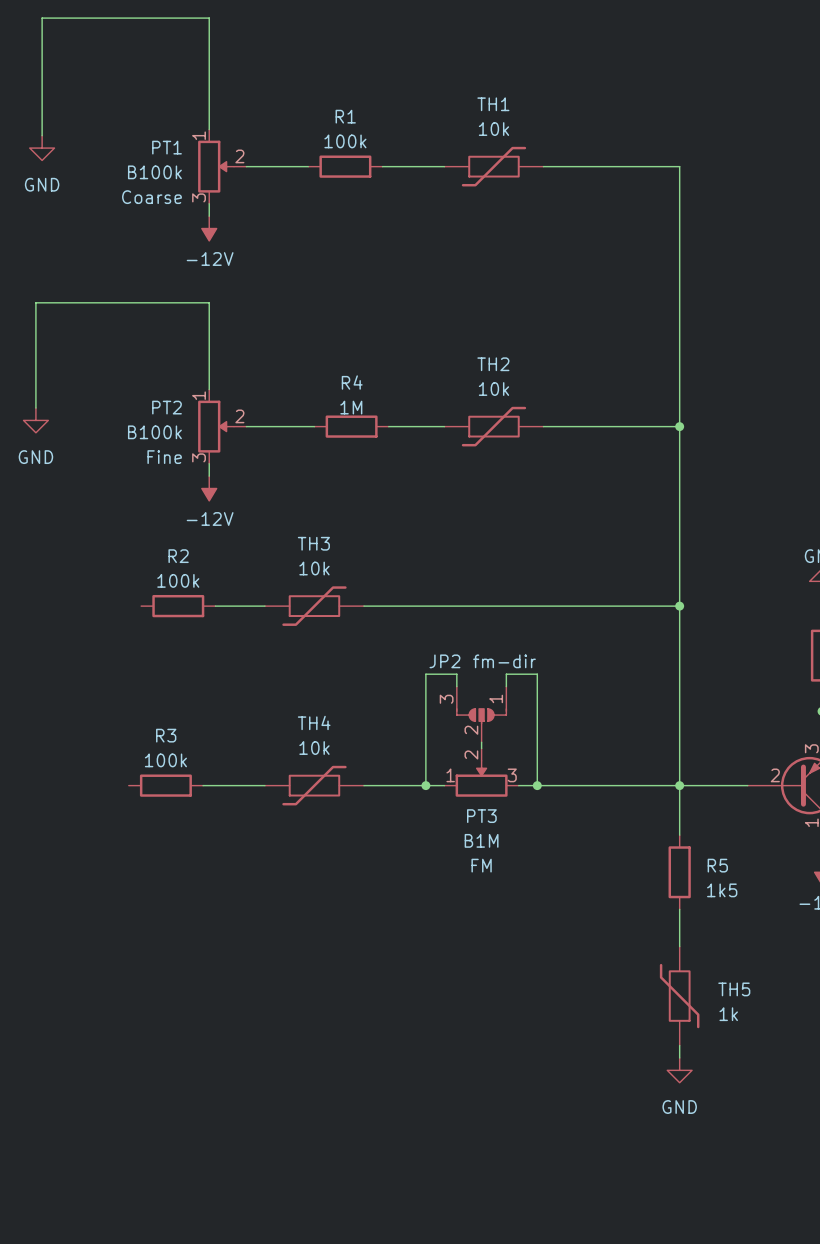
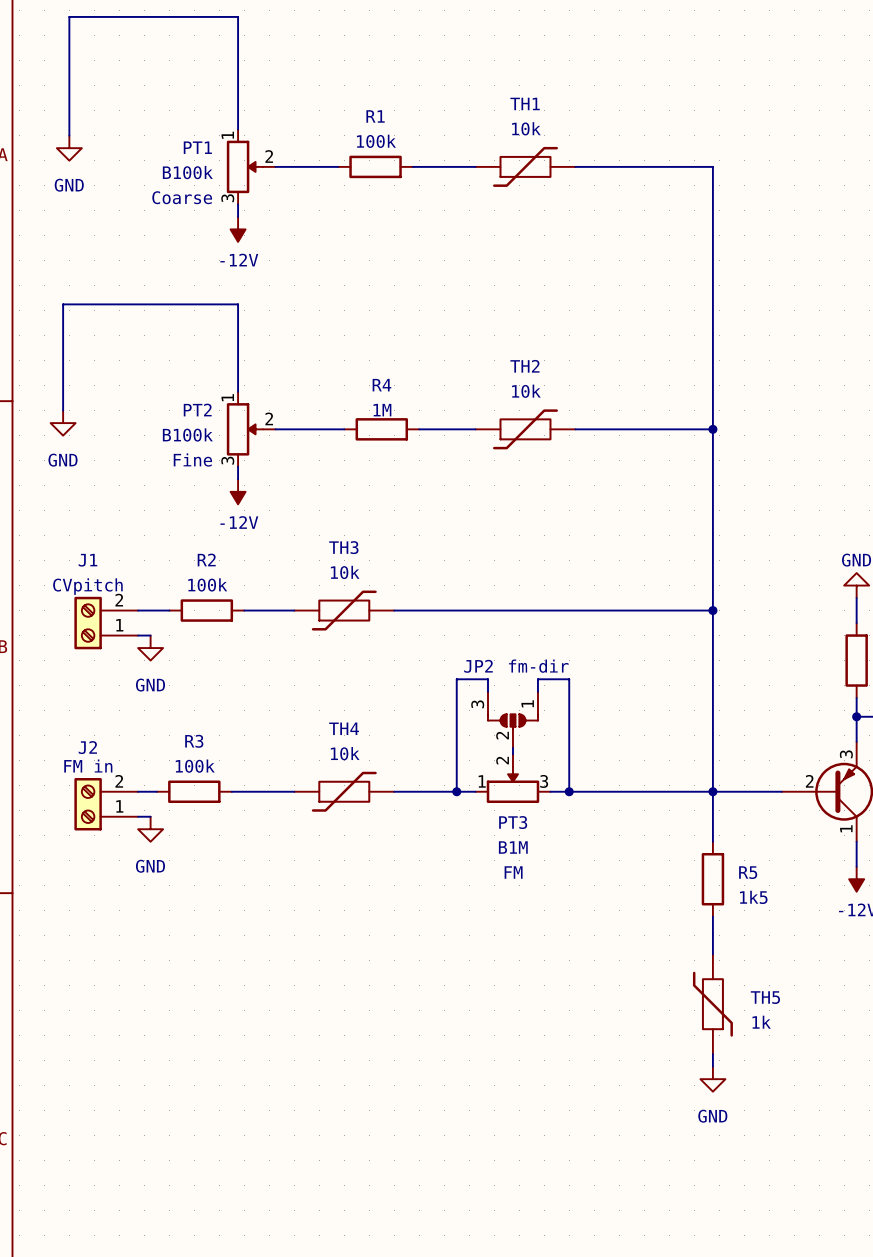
wire: none -> (138, 610) (169, 610)
J1: none -> CVpitch (106, 623)
wire: none -> (138, 635) (150, 635)
power symbol: none -> GND (150, 648)
wire: none -> (138, 791) (156, 791)
J2: none -> FM in (106, 804)
wire: none -> (138, 816) (150, 816)
power symbol: none -> GND (150, 829)

